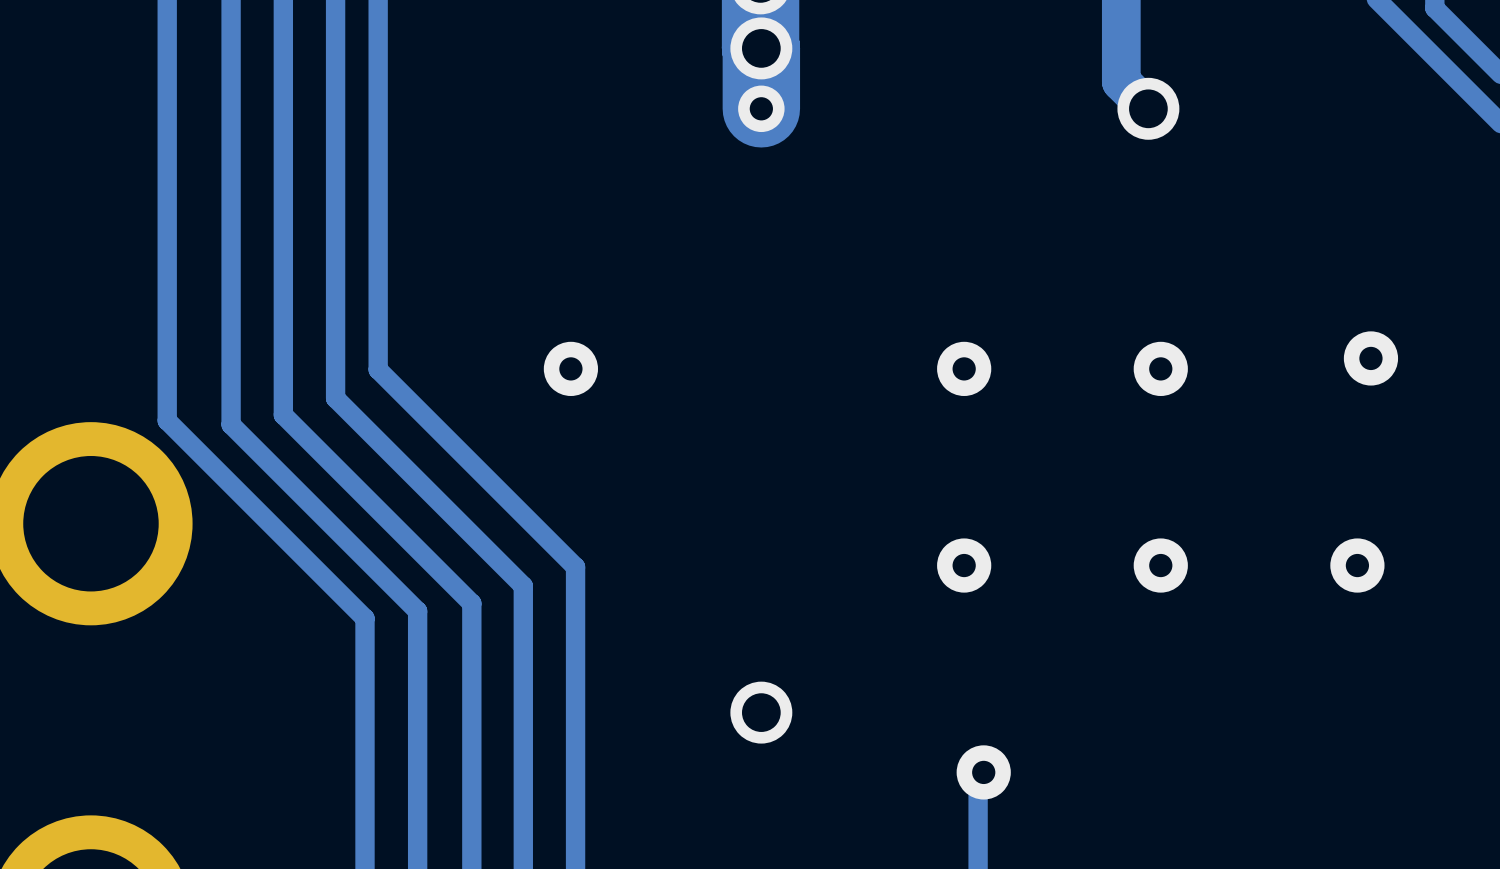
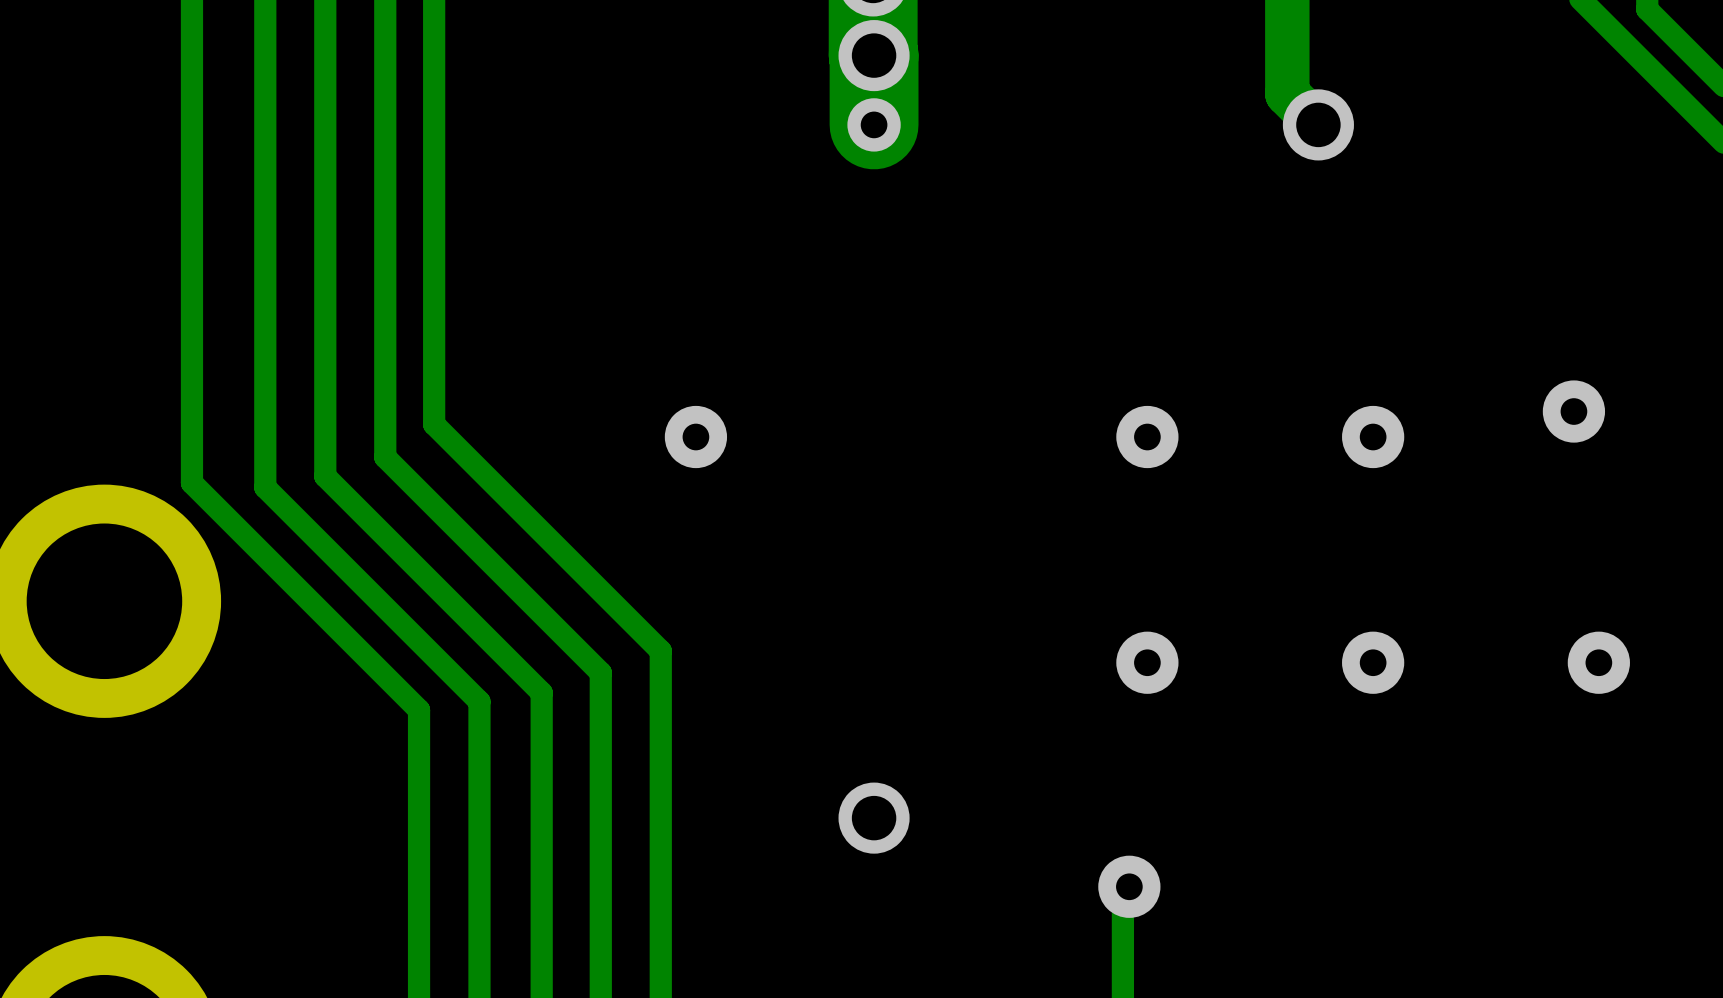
via position: (570, 368) -> (695, 437)
via position: (964, 368) -> (1147, 437)
via position: (1160, 368) -> (1373, 437)
via position: (964, 565) -> (1147, 662)
via position: (1160, 565) -> (1373, 662)
via position: (1357, 565) -> (1598, 662)

